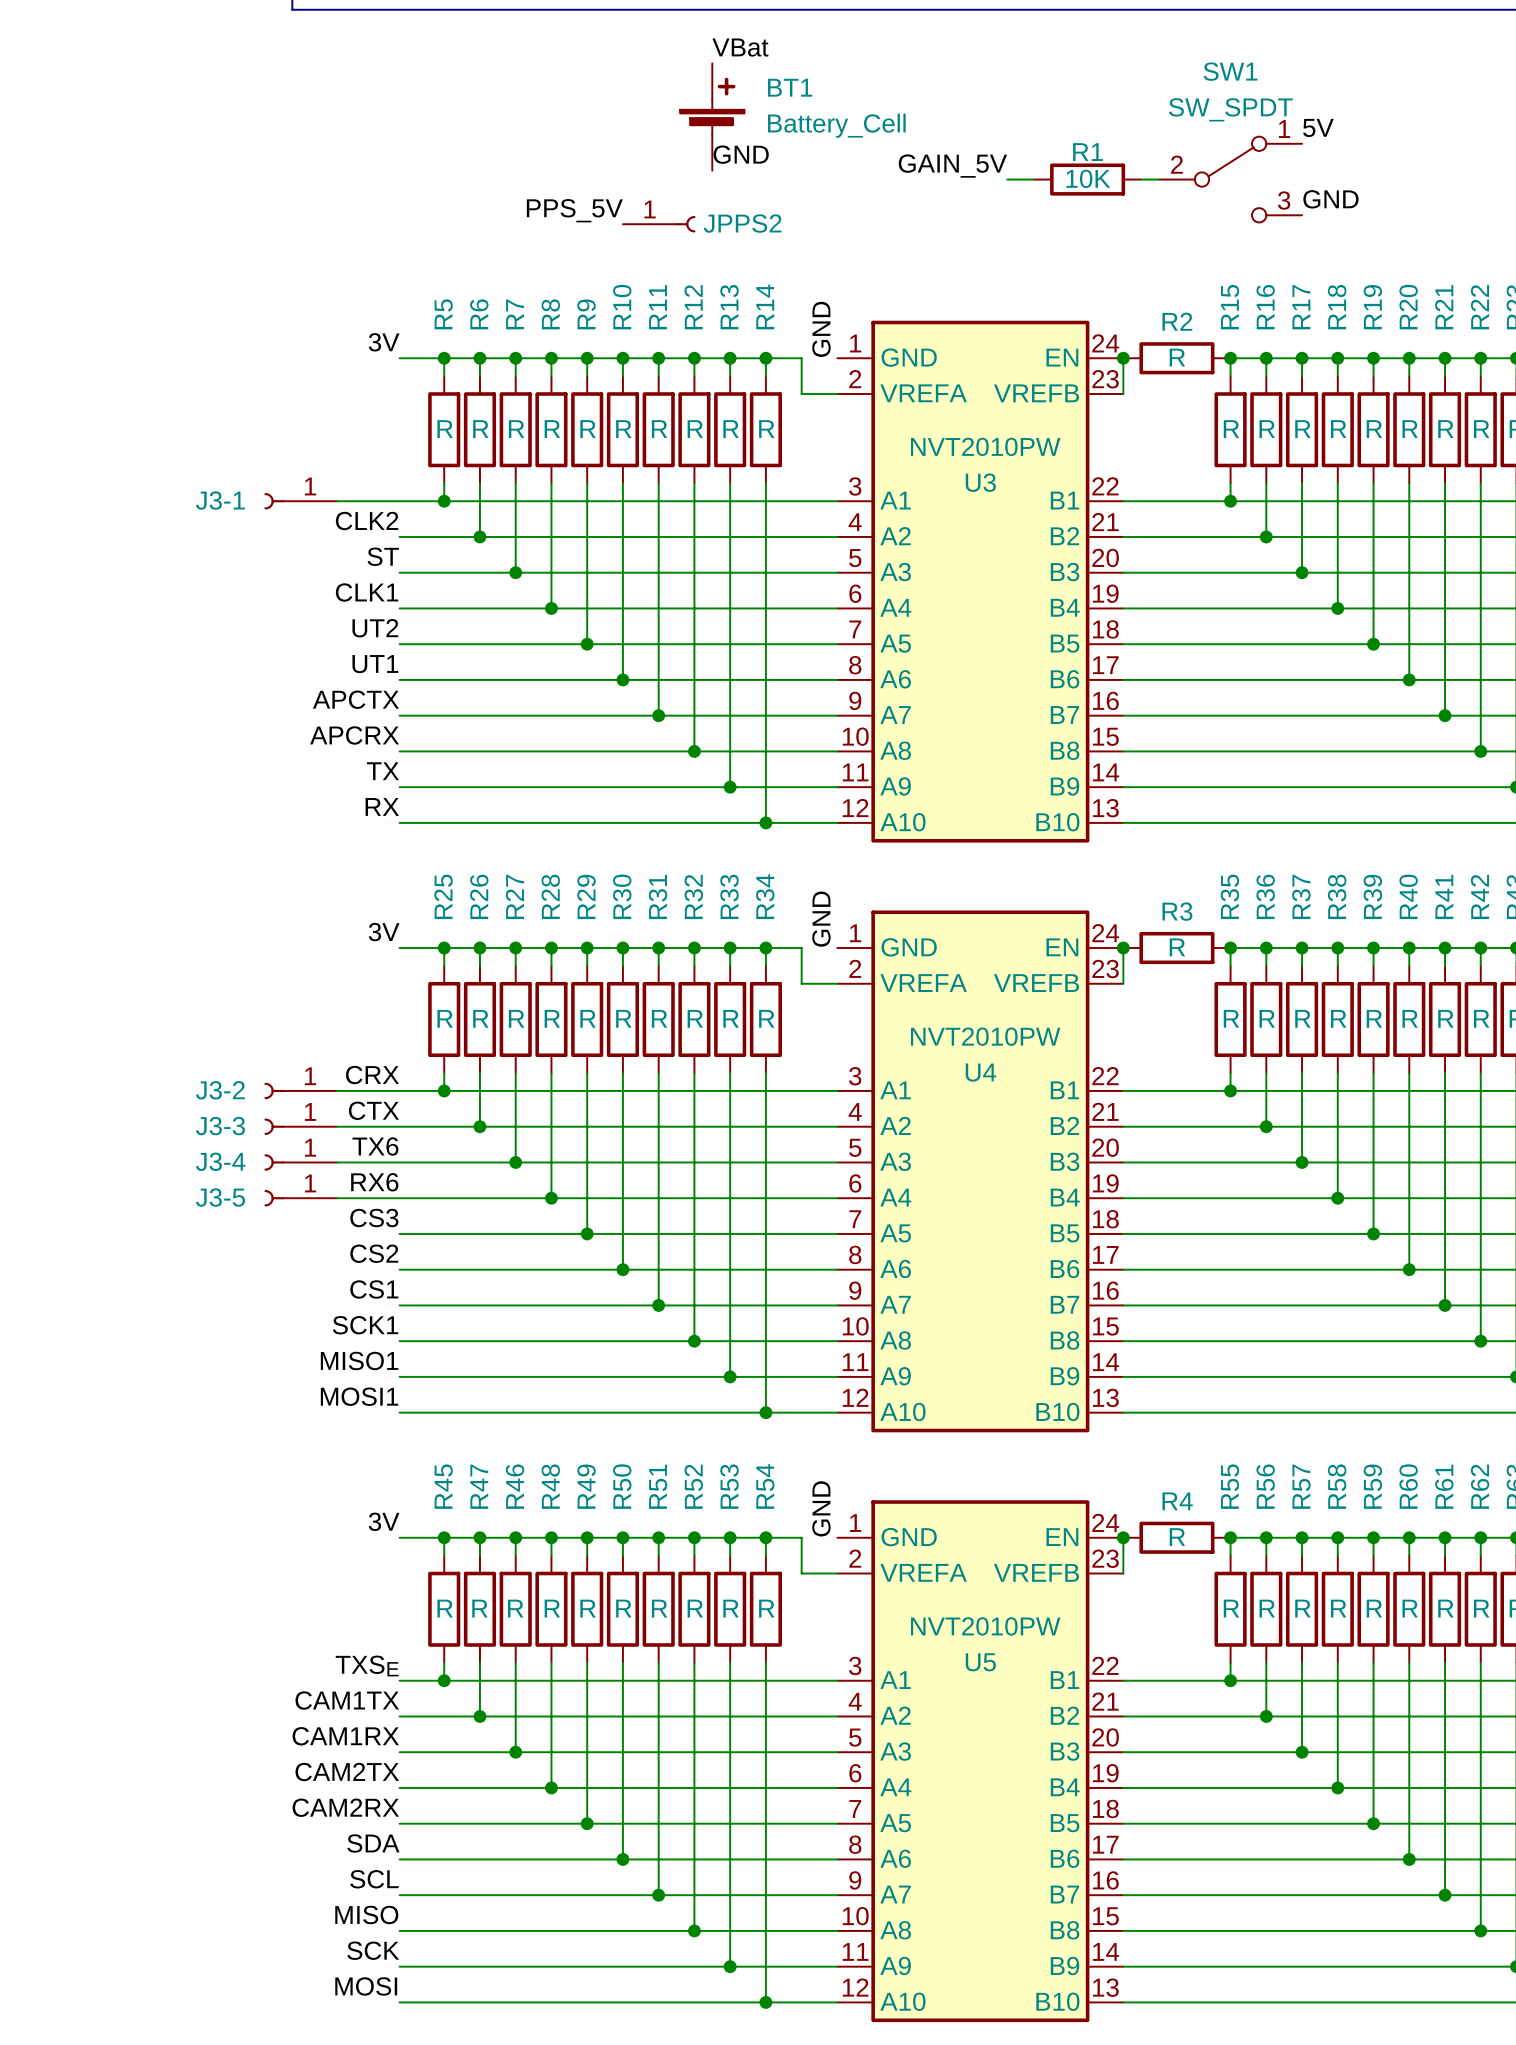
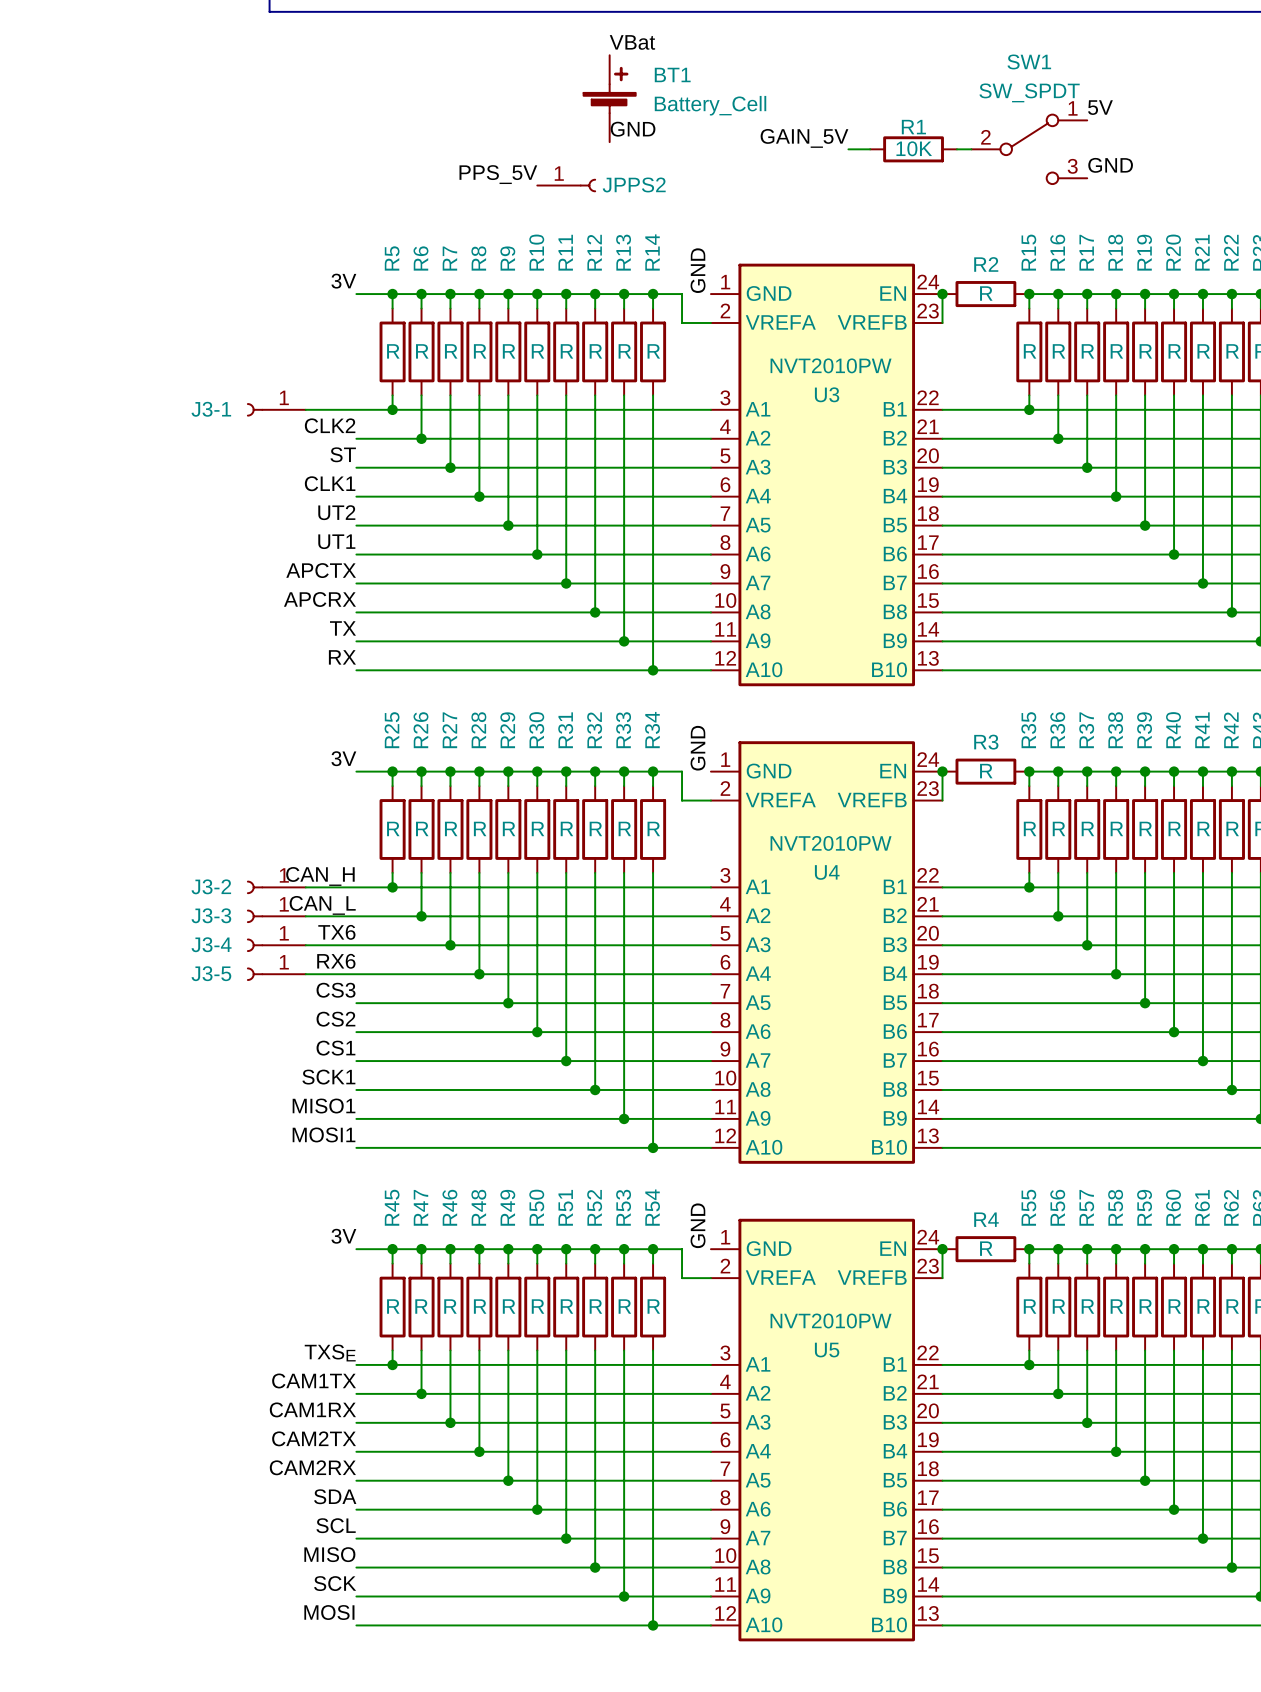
label: CRX (372, 1075) -> CAN_H (320, 876)
label: CTX (373, 1110) -> CAN_L (322, 905)

